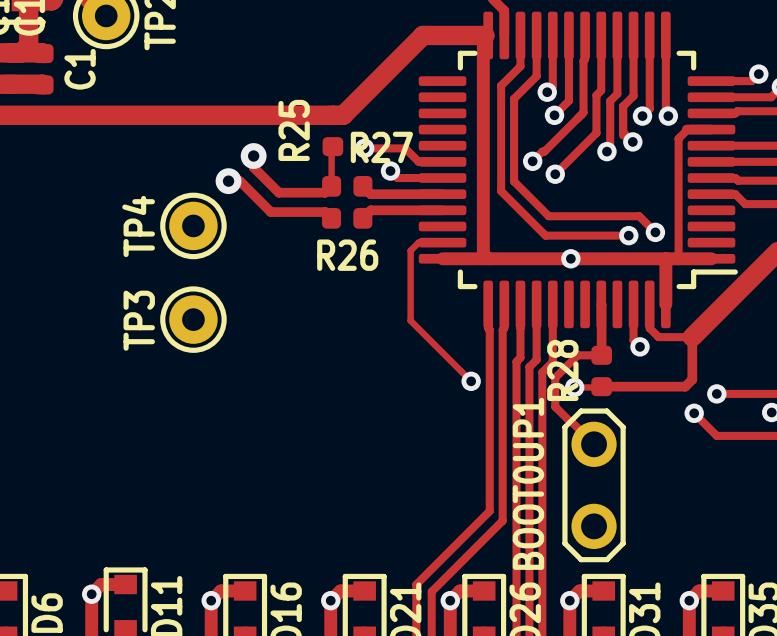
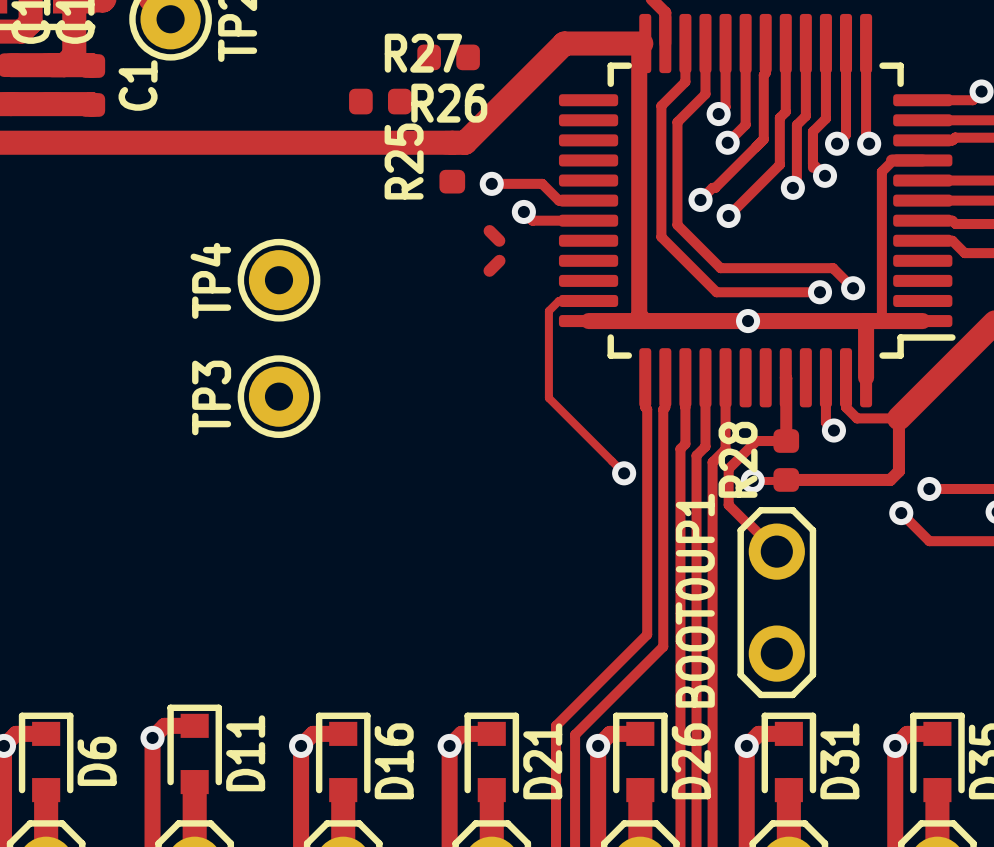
track: (332, 146) (331, 186) (325, 192) (278, 192) (253, 167) (253, 156) -> none
via: (253, 156) -> none
track: (228, 181) (239, 181) (270, 212) (325, 212) (331, 218) -> none
via: (228, 181) -> none
R27 position: (347, 186) -> (380, 101)
track: (370, 194) (442, 194) -> none
track: (370, 210) (442, 210) -> none
R26 position: (347, 218) -> (448, 57)

